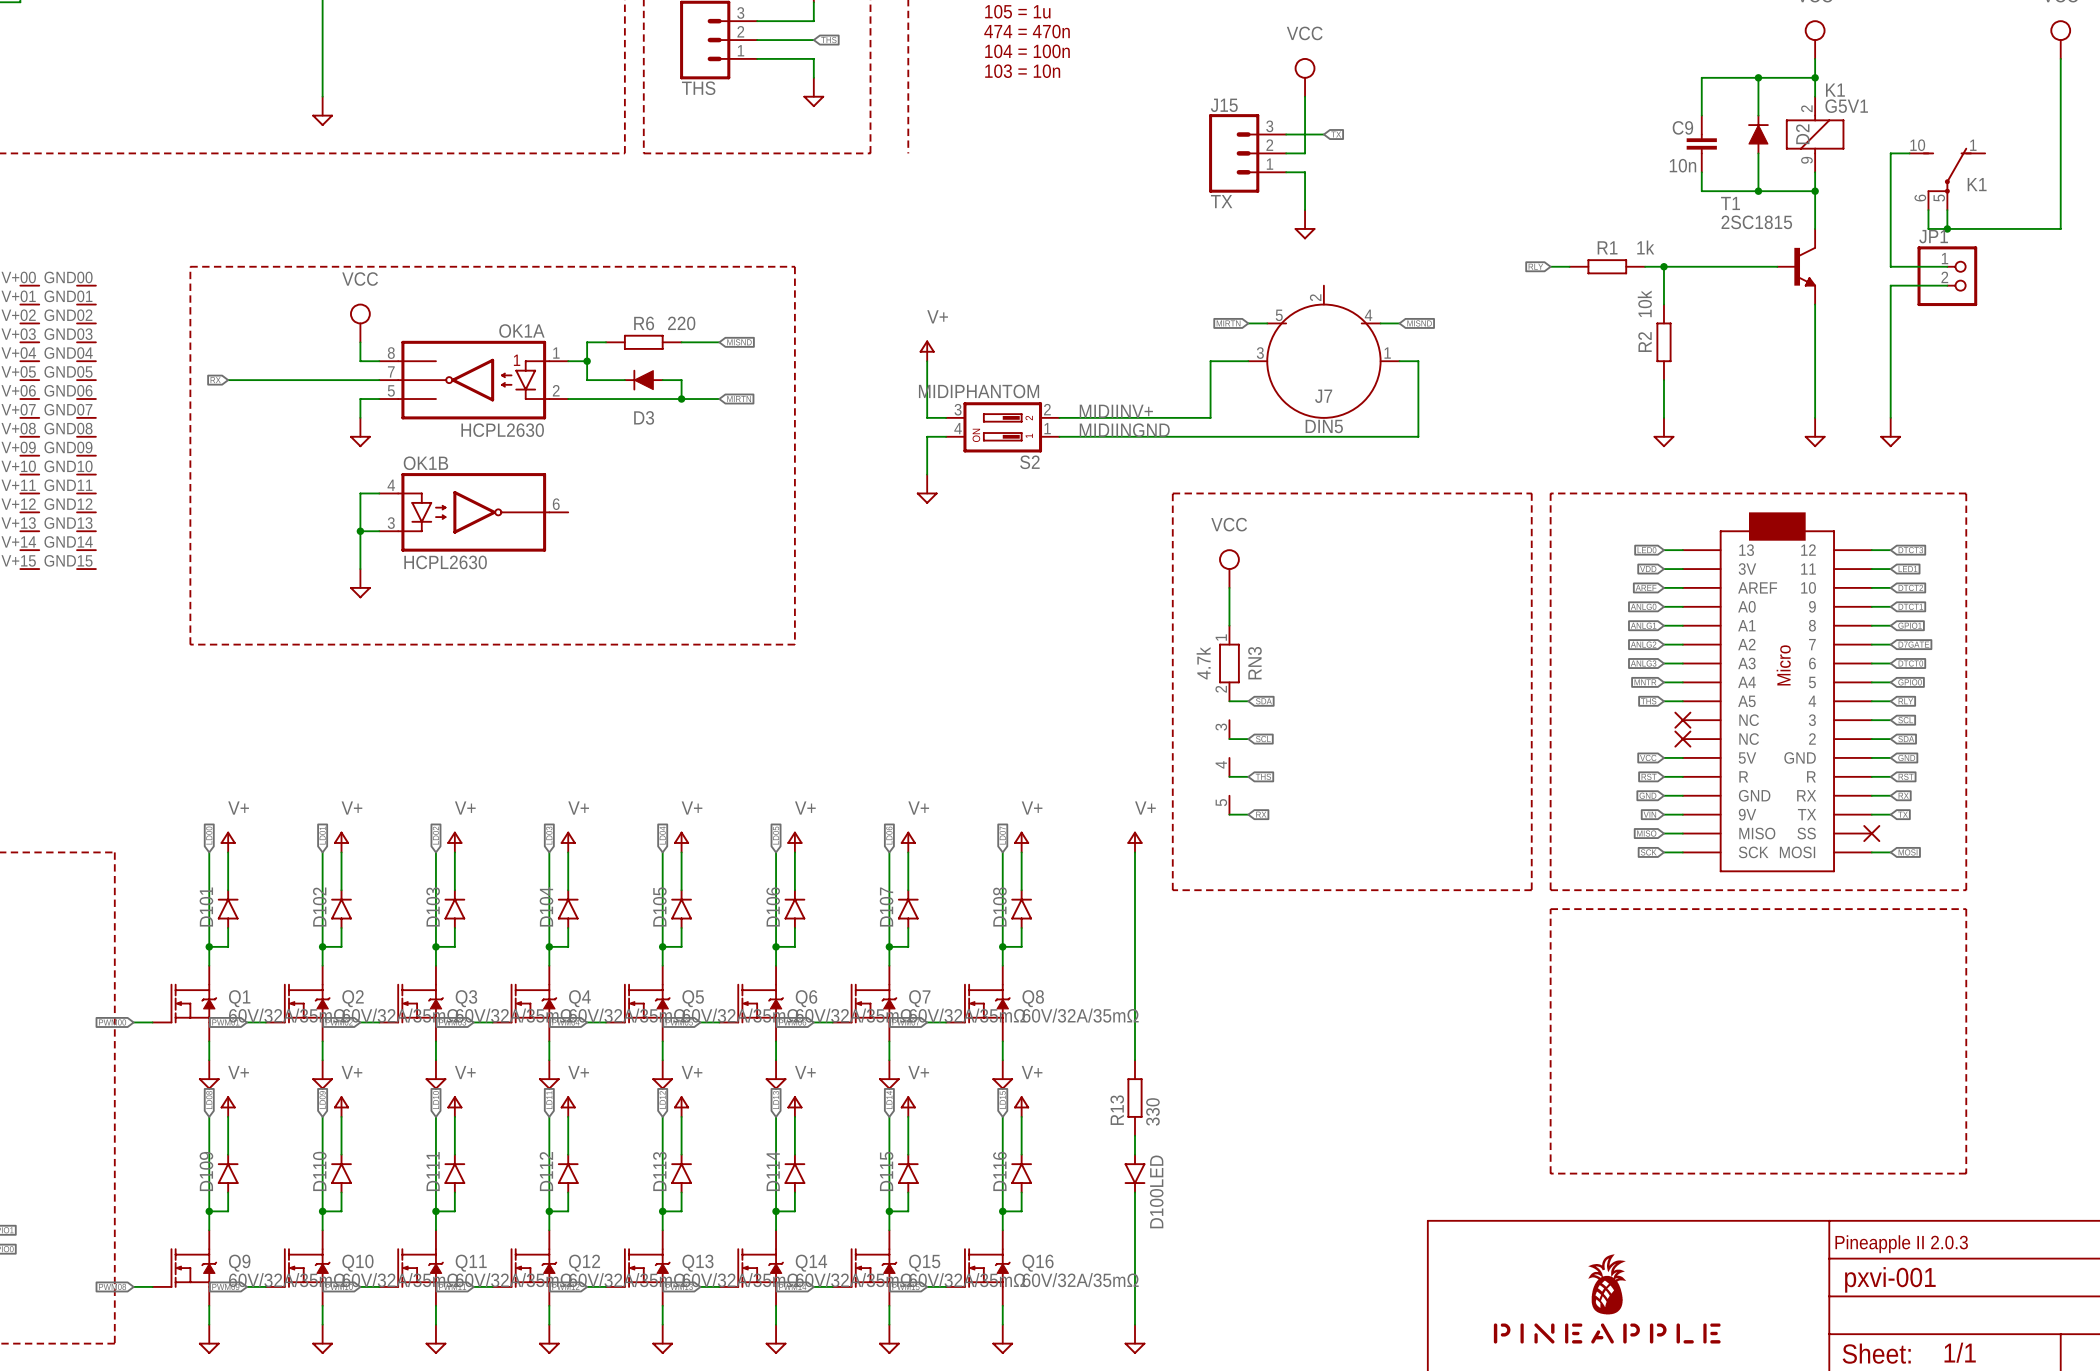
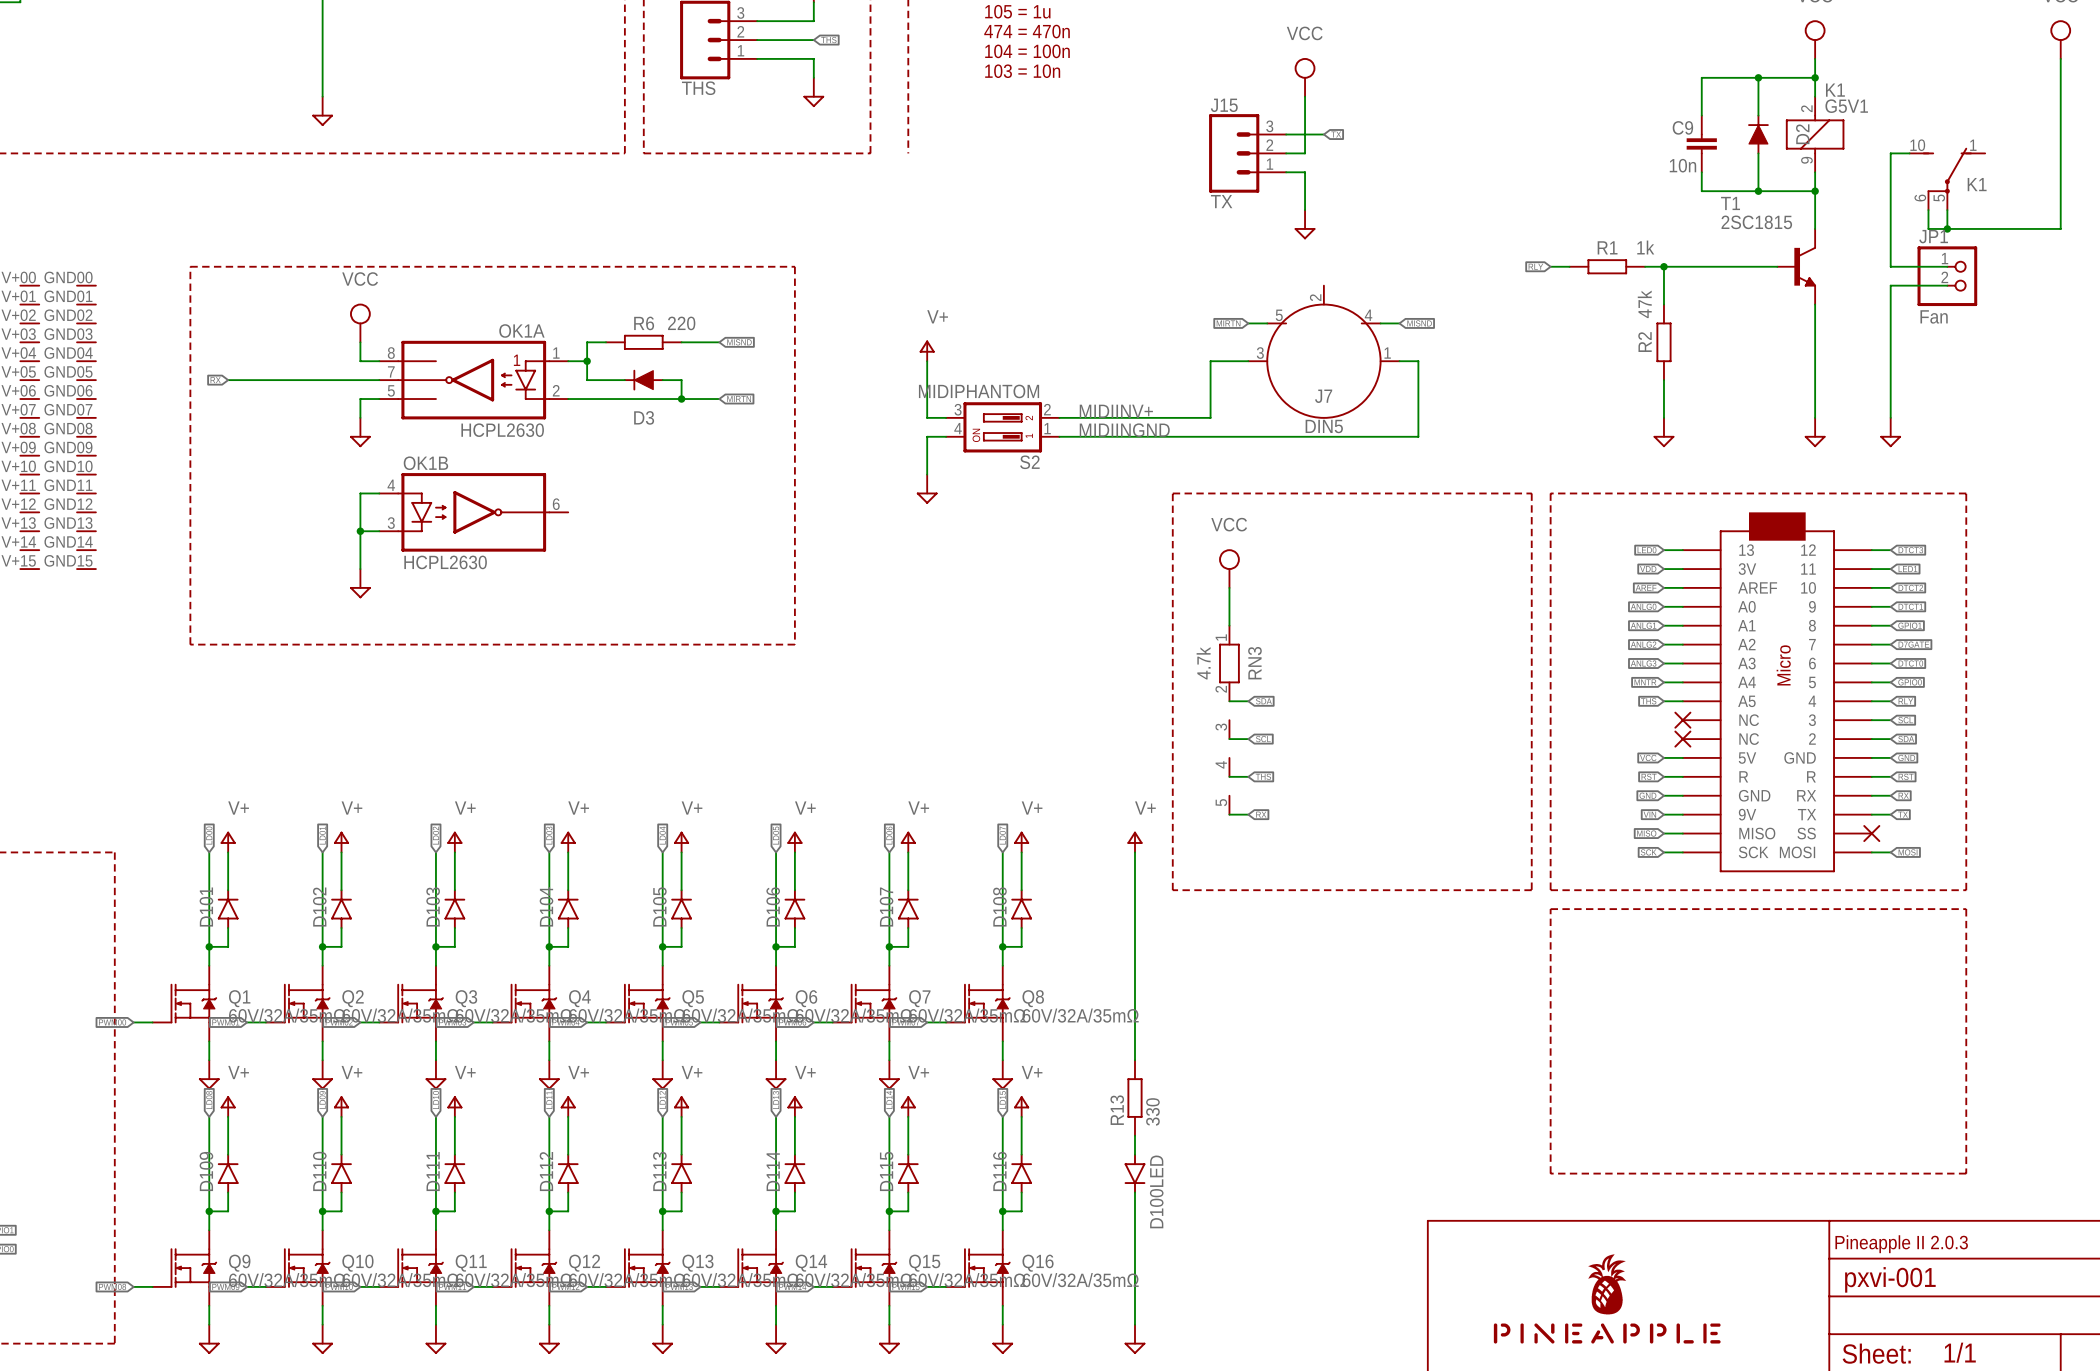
R2 value: 10k (1644, 303) -> 47k (1644, 304)
JP1 value: none -> Fan (1934, 316)

